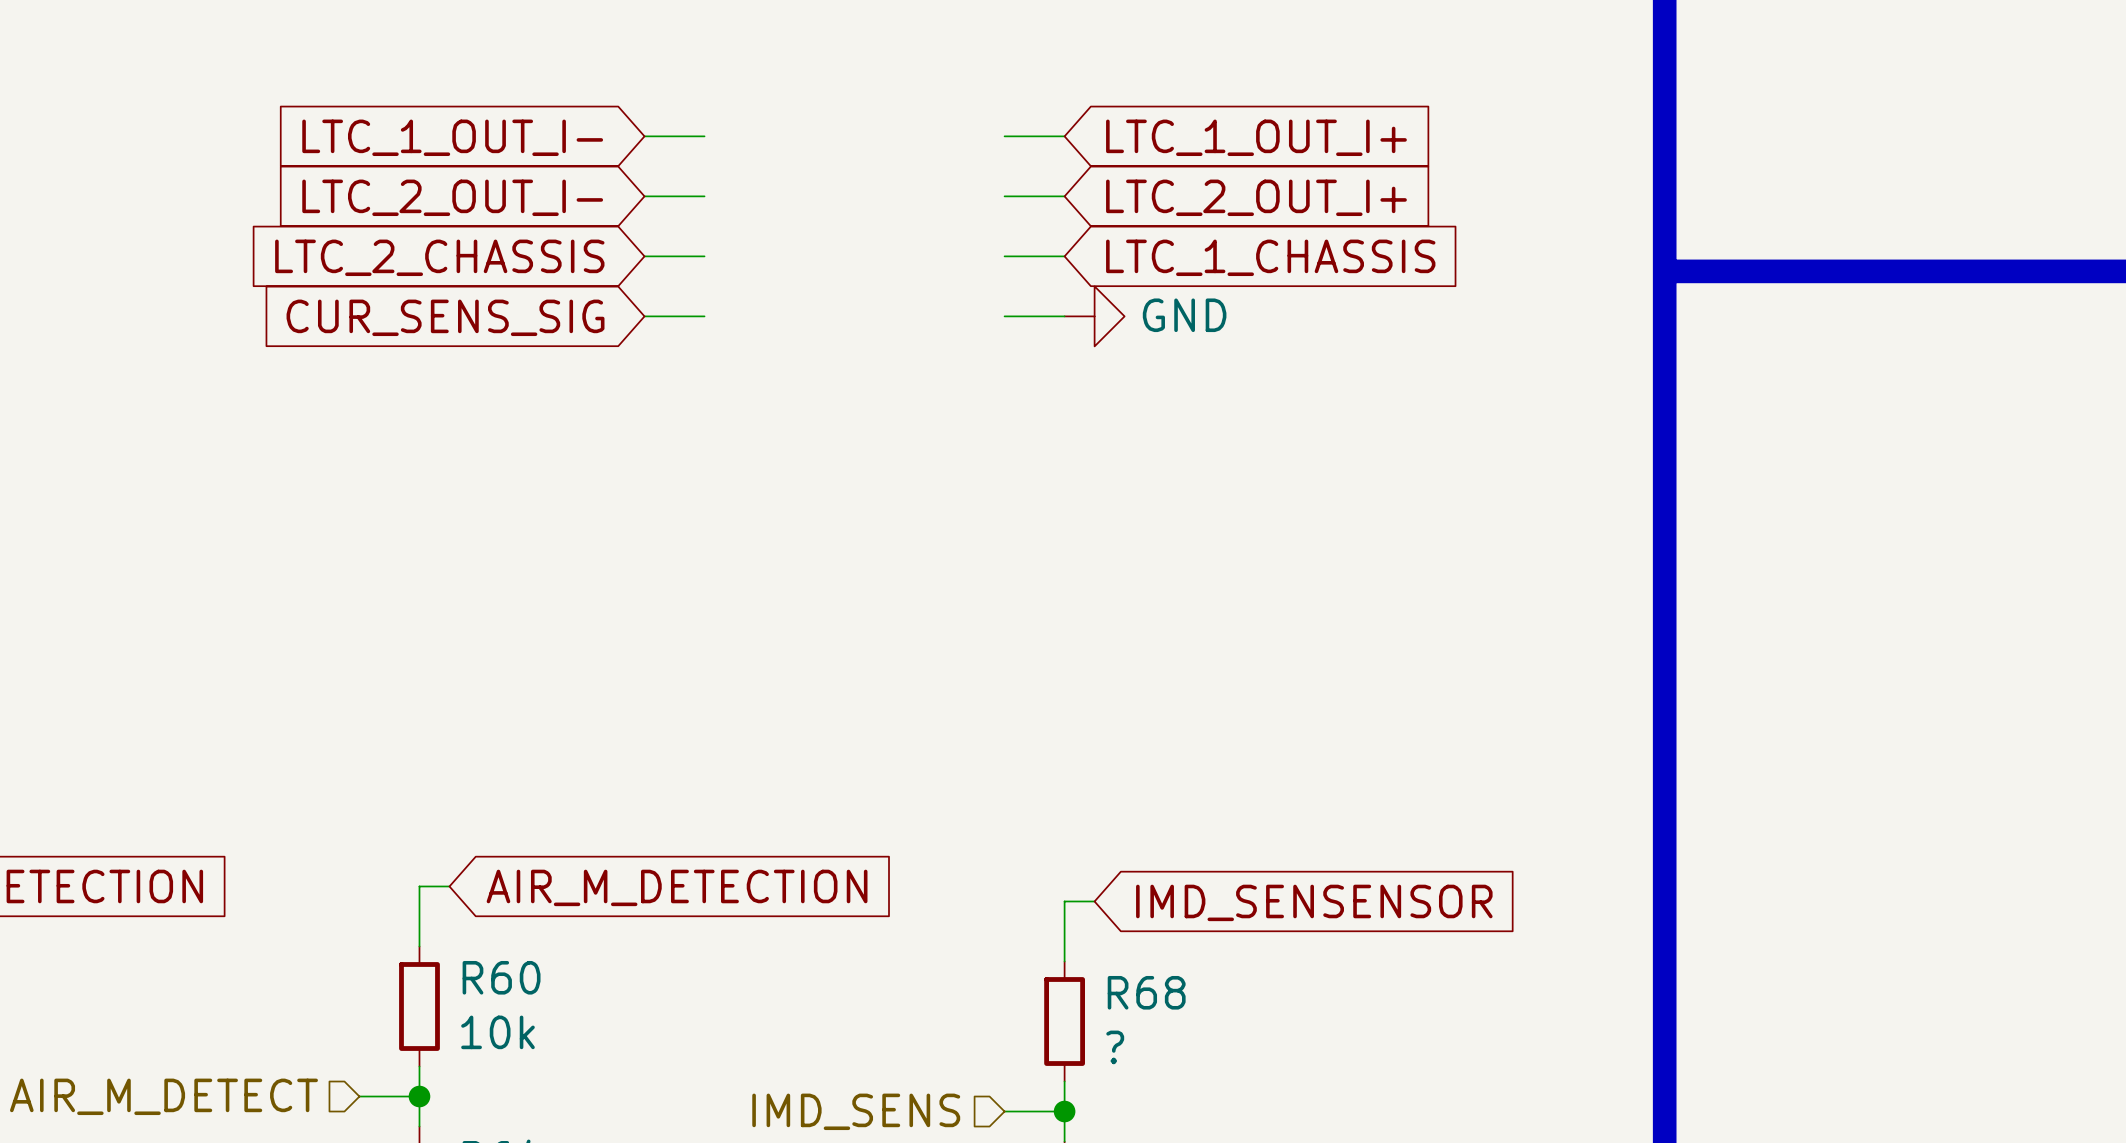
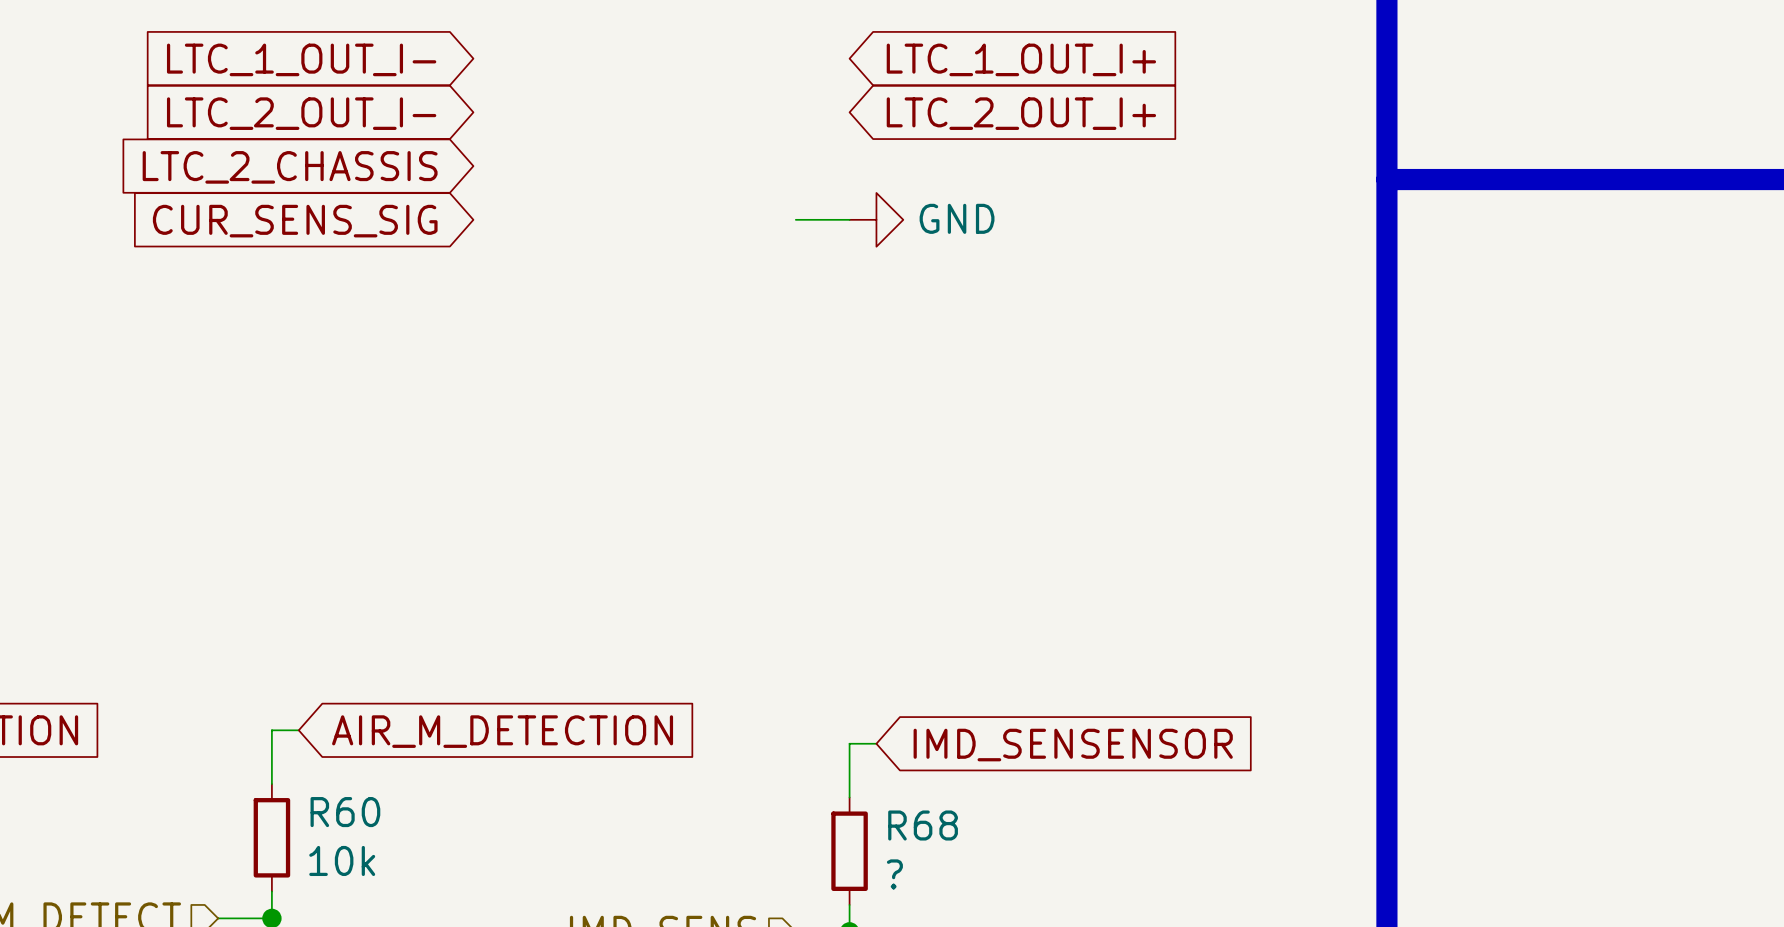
wire: (644, 136) (704, 136) -> none
wire: (1004, 136) (1064, 136) -> none
wire: (644, 196) (704, 196) -> none
wire: (1004, 196) (1064, 196) -> none
wire: (644, 256) (704, 256) -> none
wire: (1004, 256) (1064, 256) -> none
global label: LTC_1_CHASSIS (1270, 257) -> none
wire: (644, 316) (704, 316) -> none

